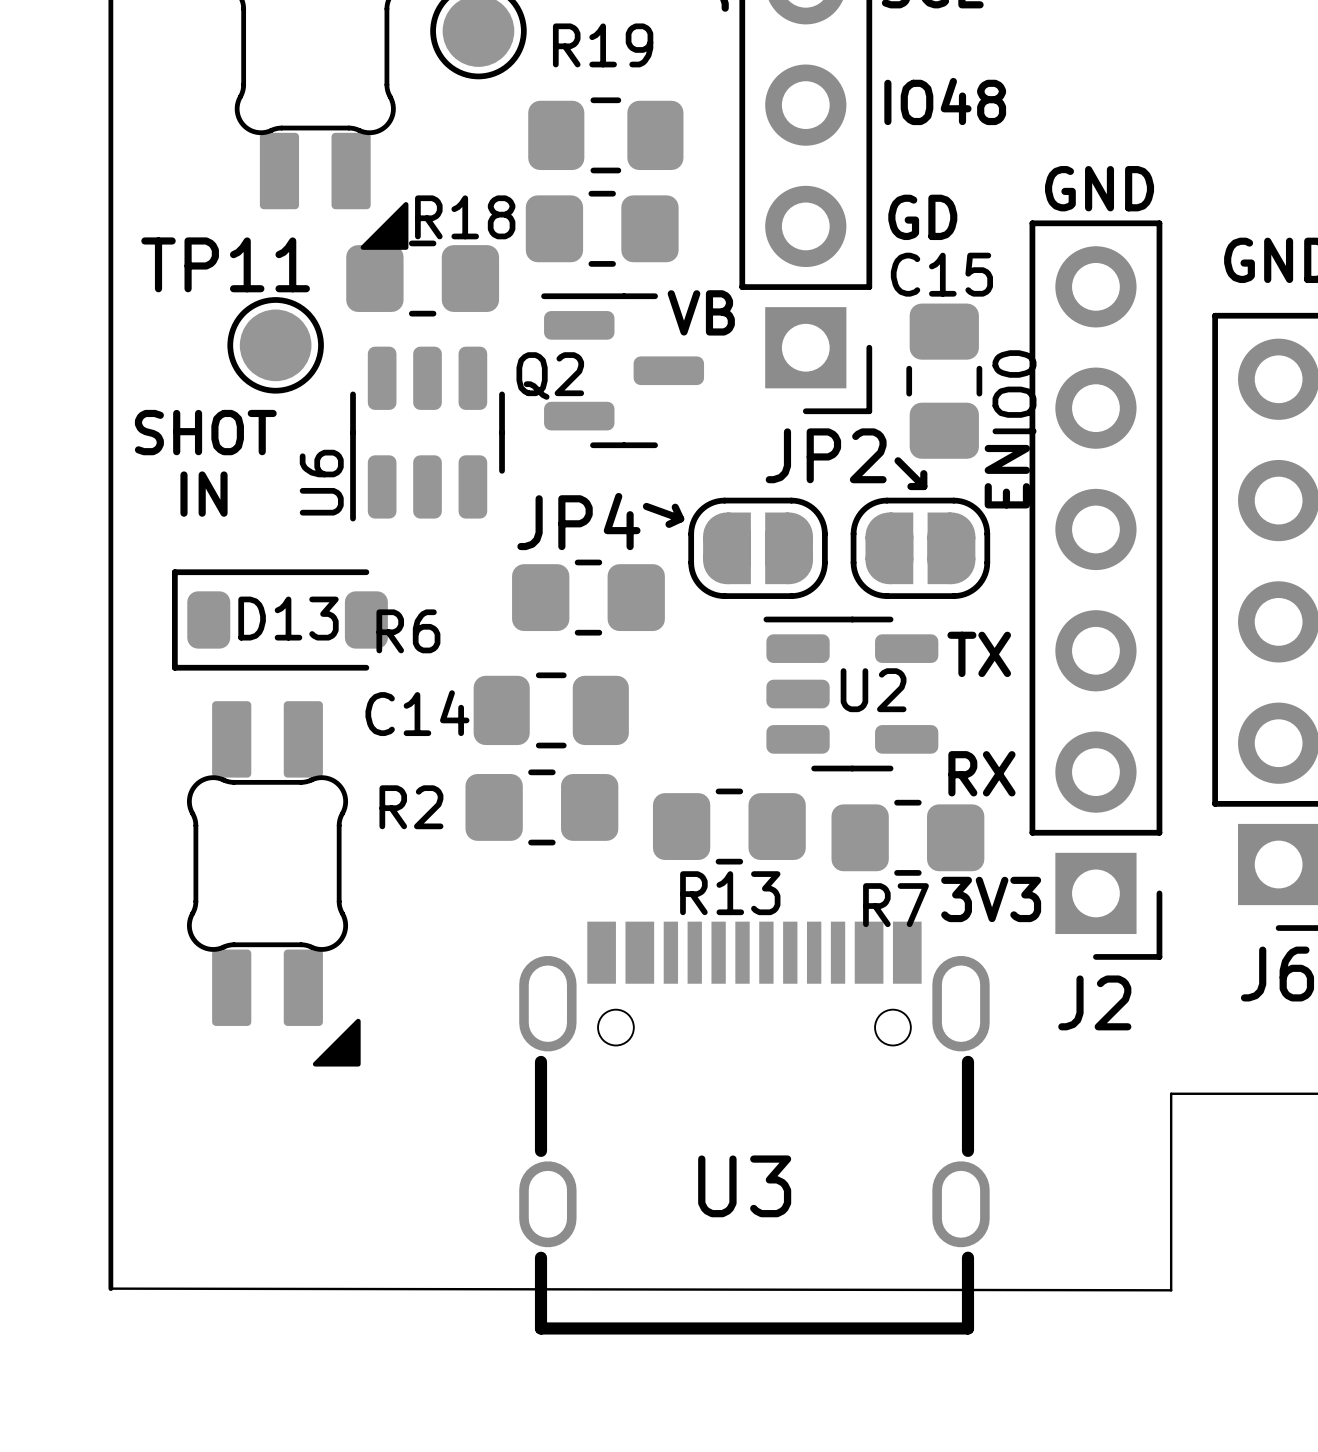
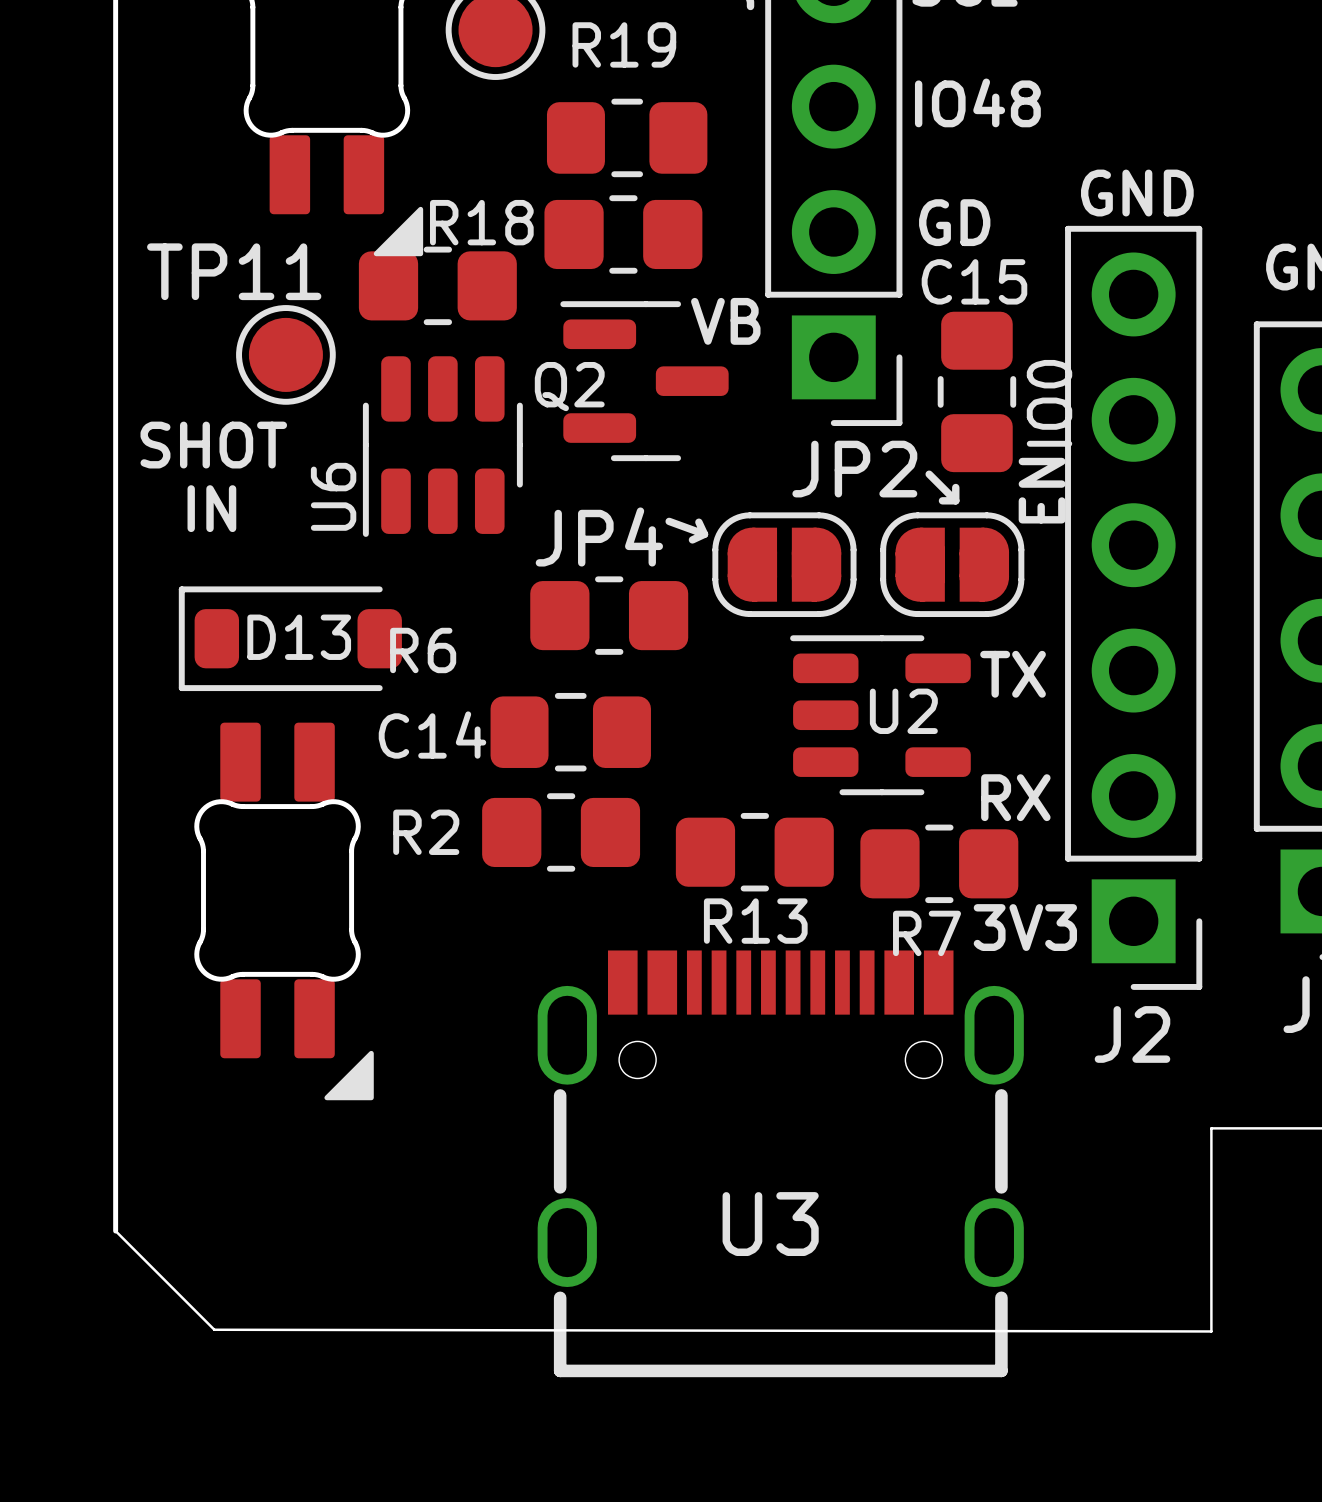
board edge: (110, 1193) (110, 1288) (1171, 1290) -> (115, 1231) (214, 1329) (1211, 1331)

